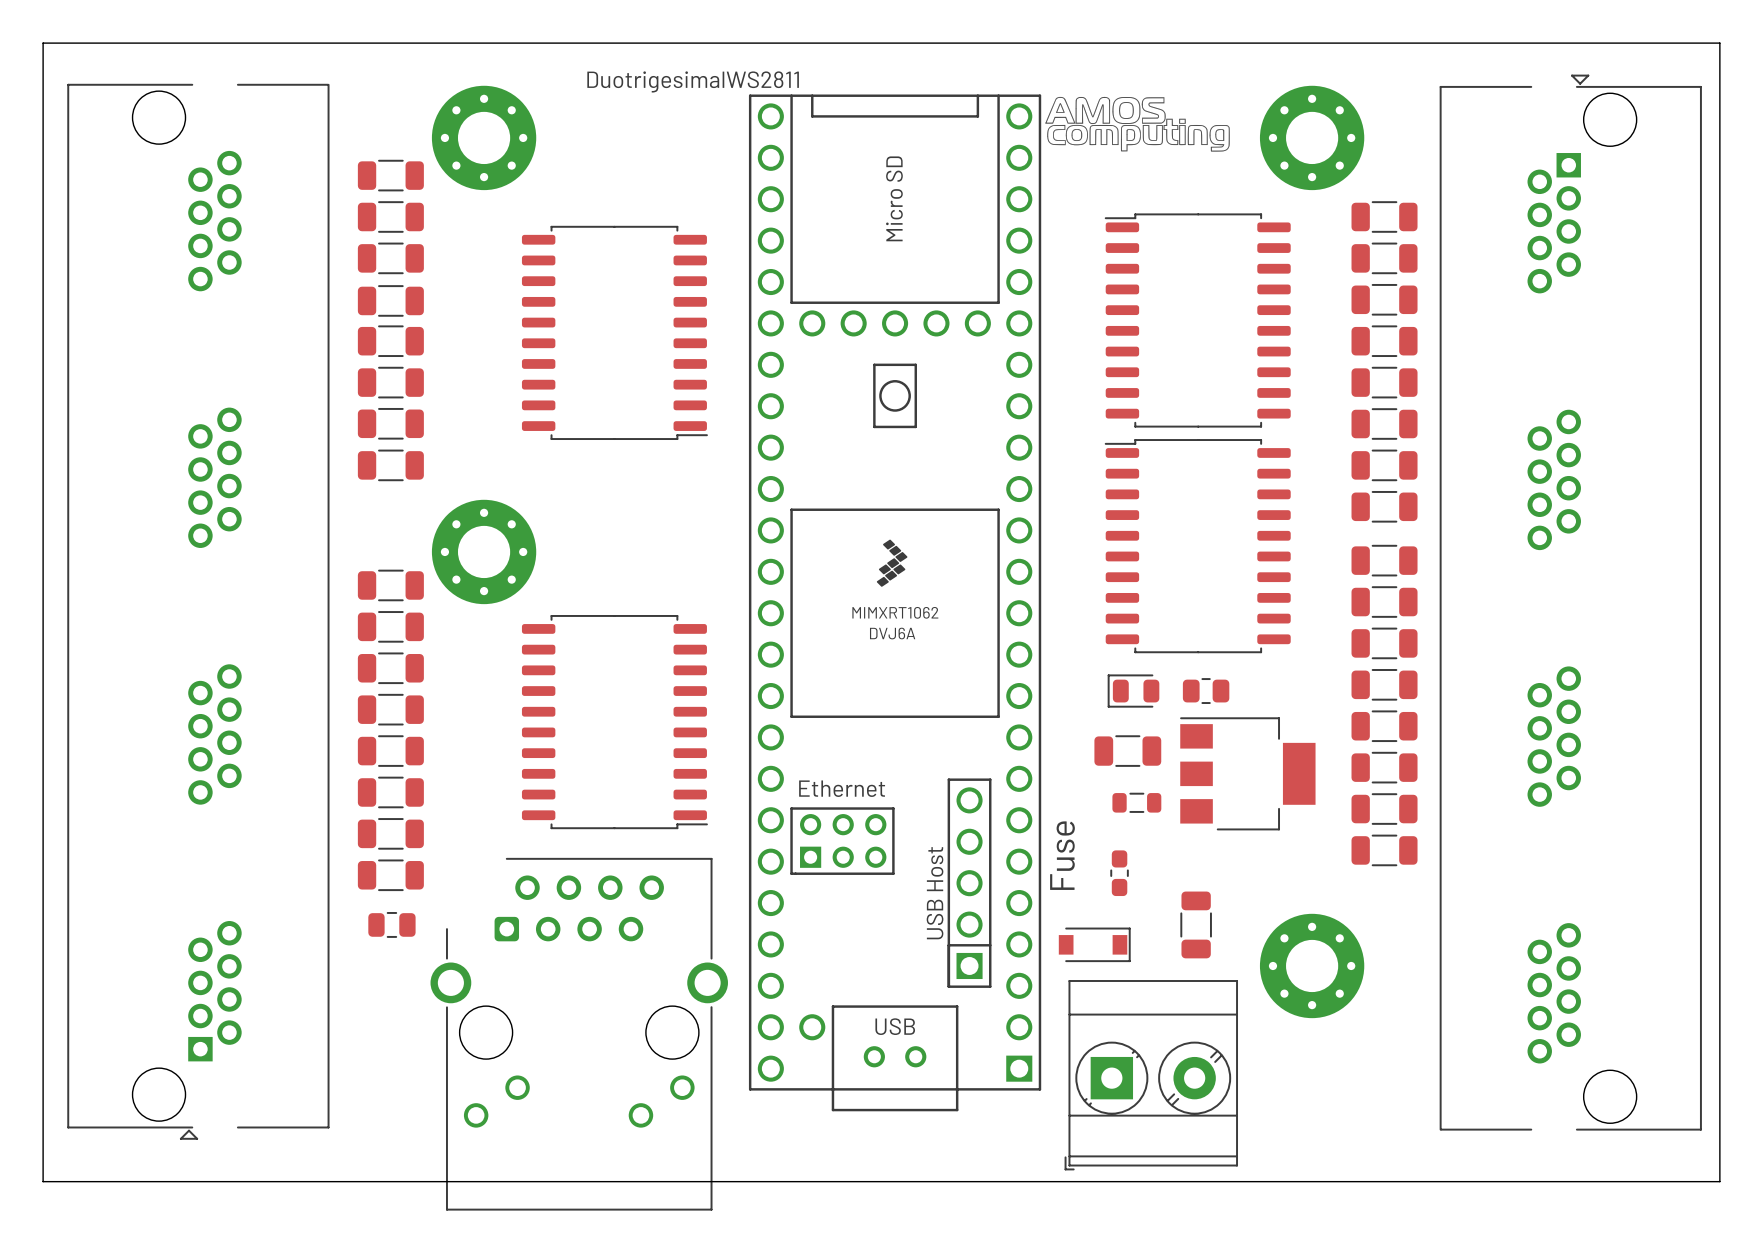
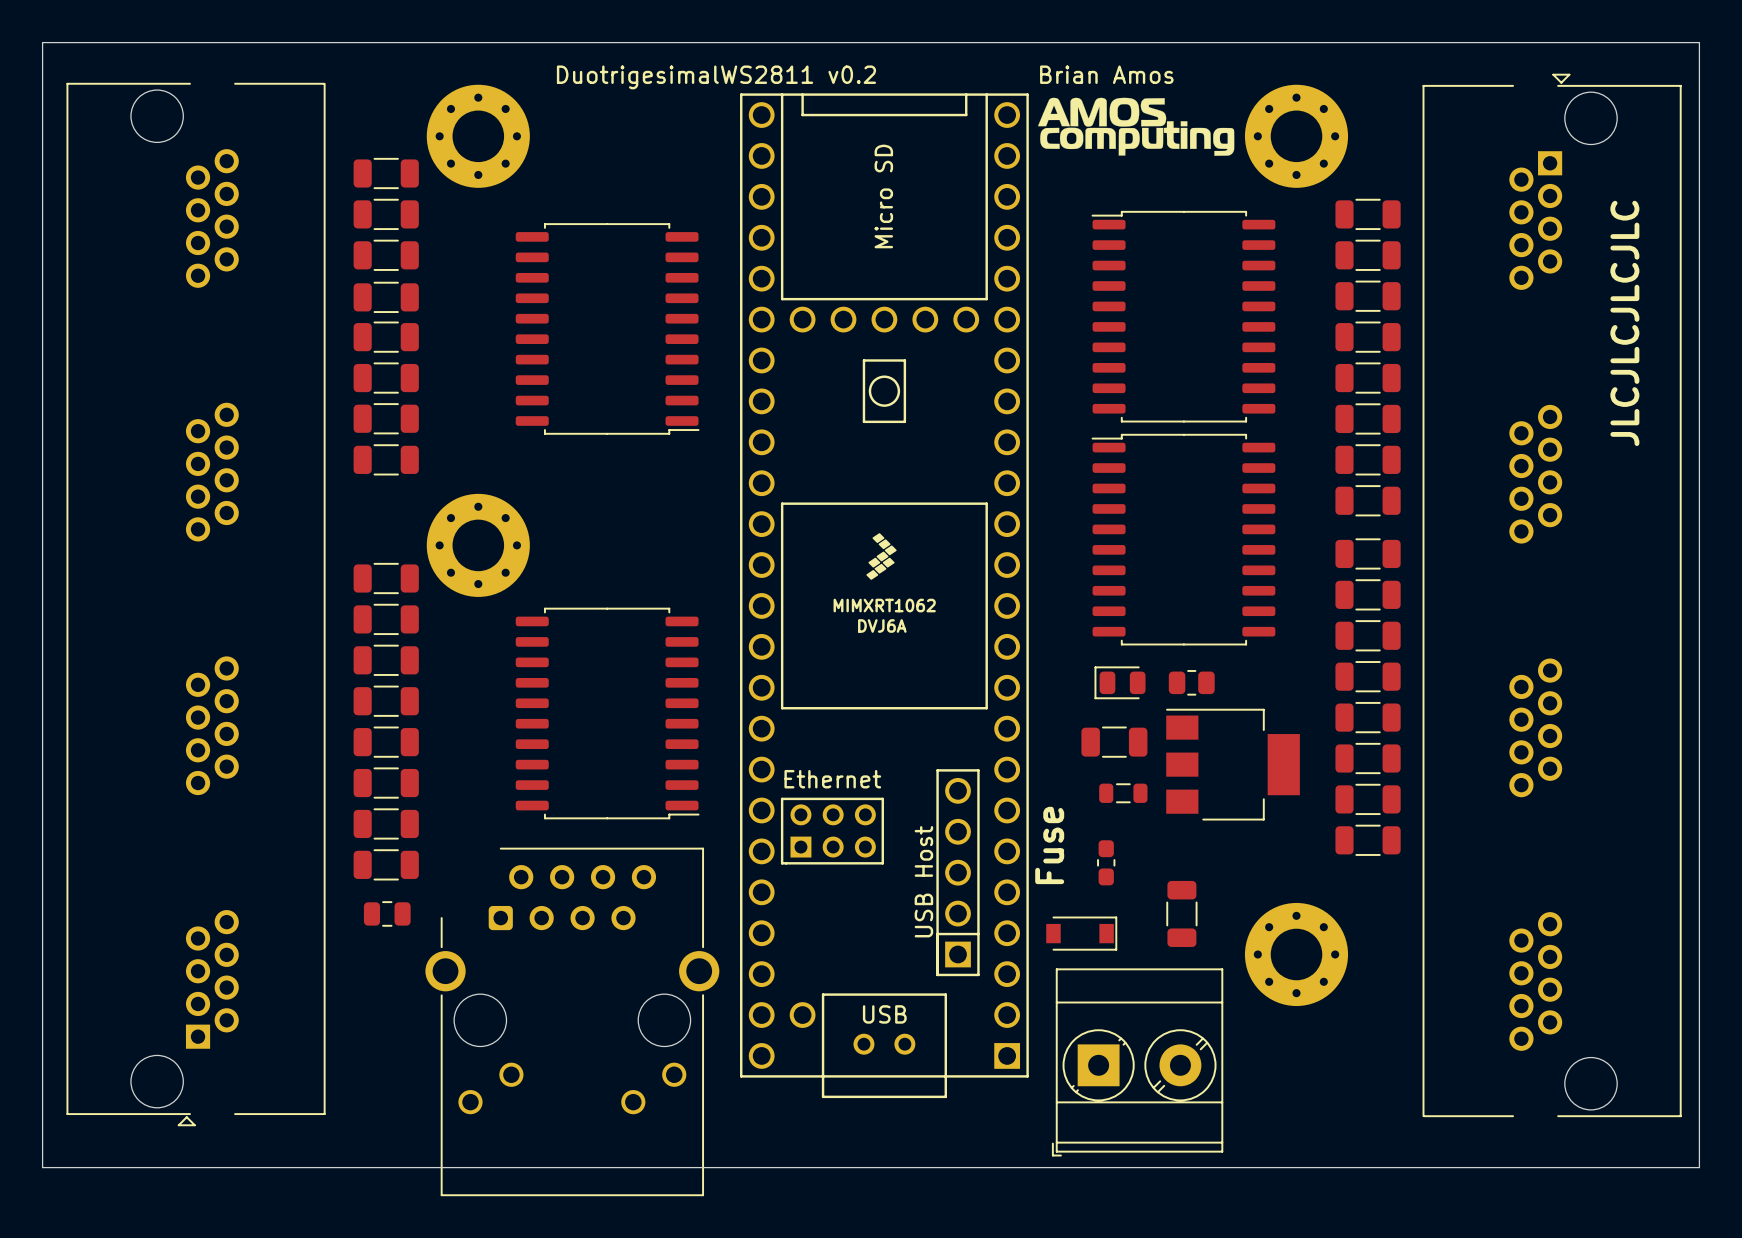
text: none -> DuotrigesimalWS2811 v0.2 Brian Amos (865, 77)
text: DuotrigesimalWS2811 (693, 81) -> none
drawing shape: [1045, 96, 1230, 152] -> [1038, 97, 1235, 156]
text: none -> JLCJLCJLCJLC (1624, 323)

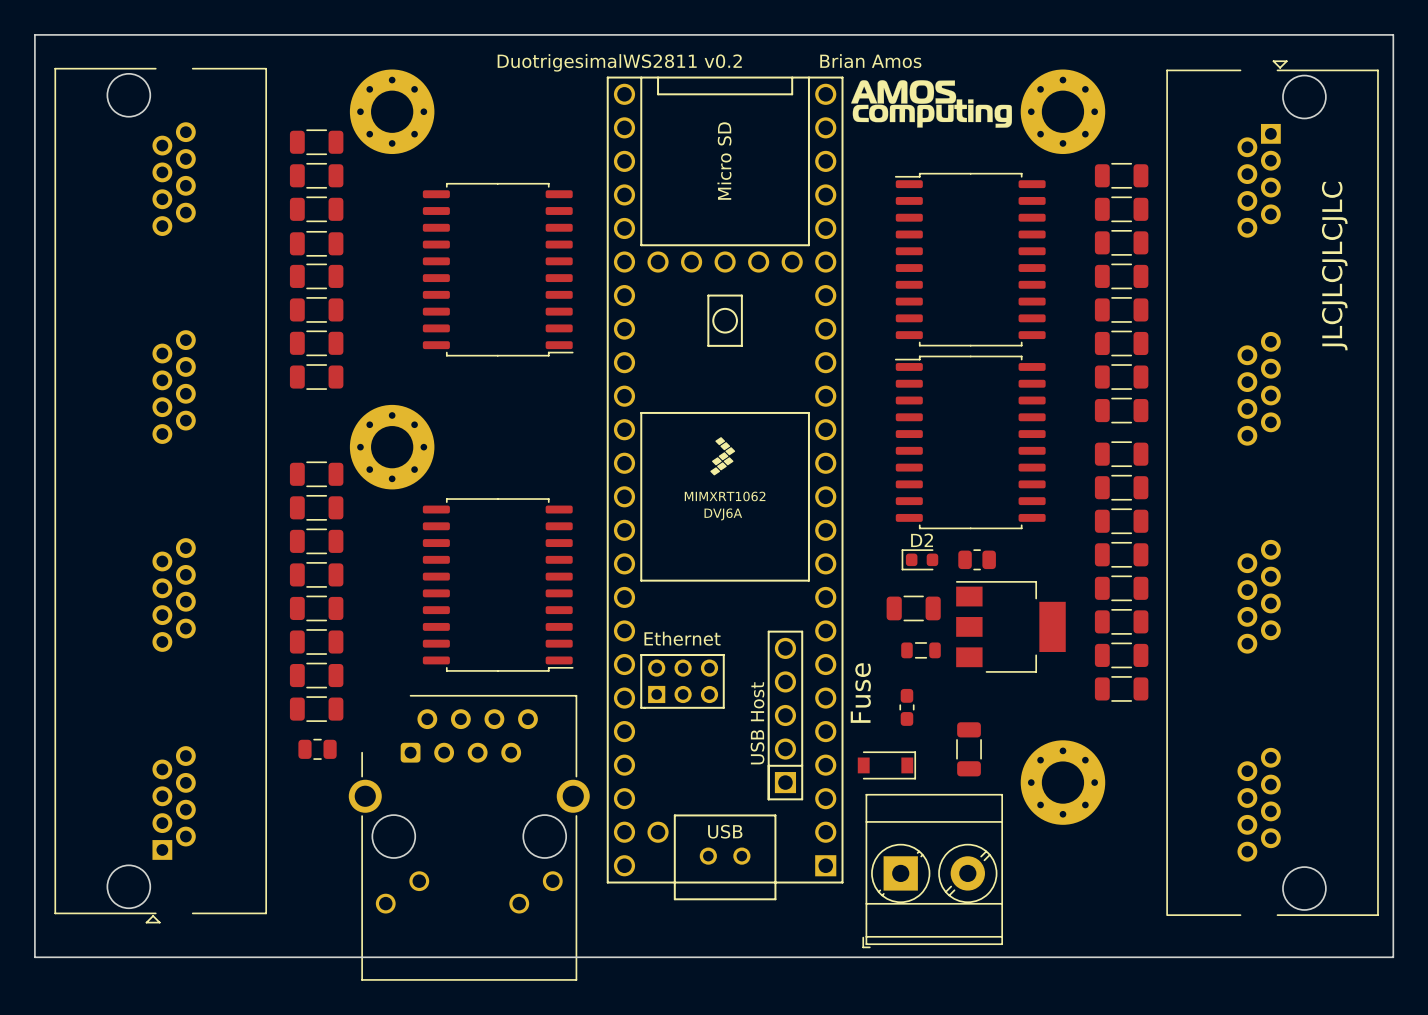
part: (1120, 682) -> none
D2: none -> (919, 559)

